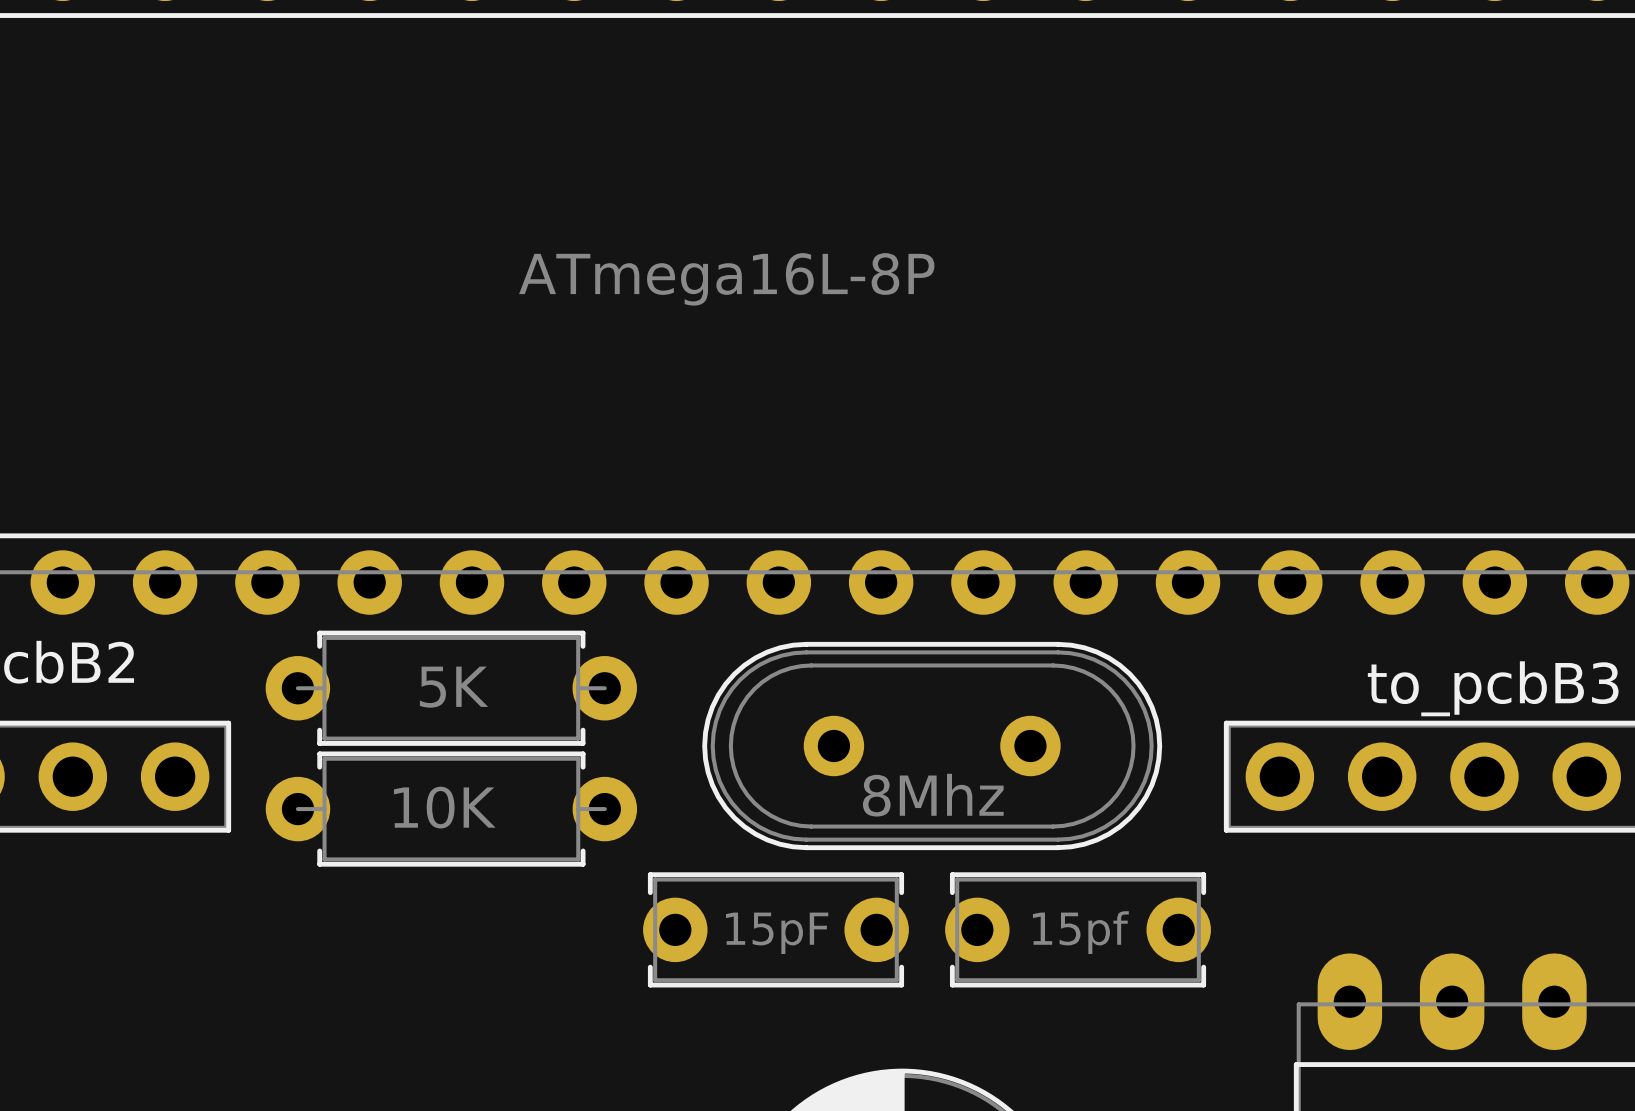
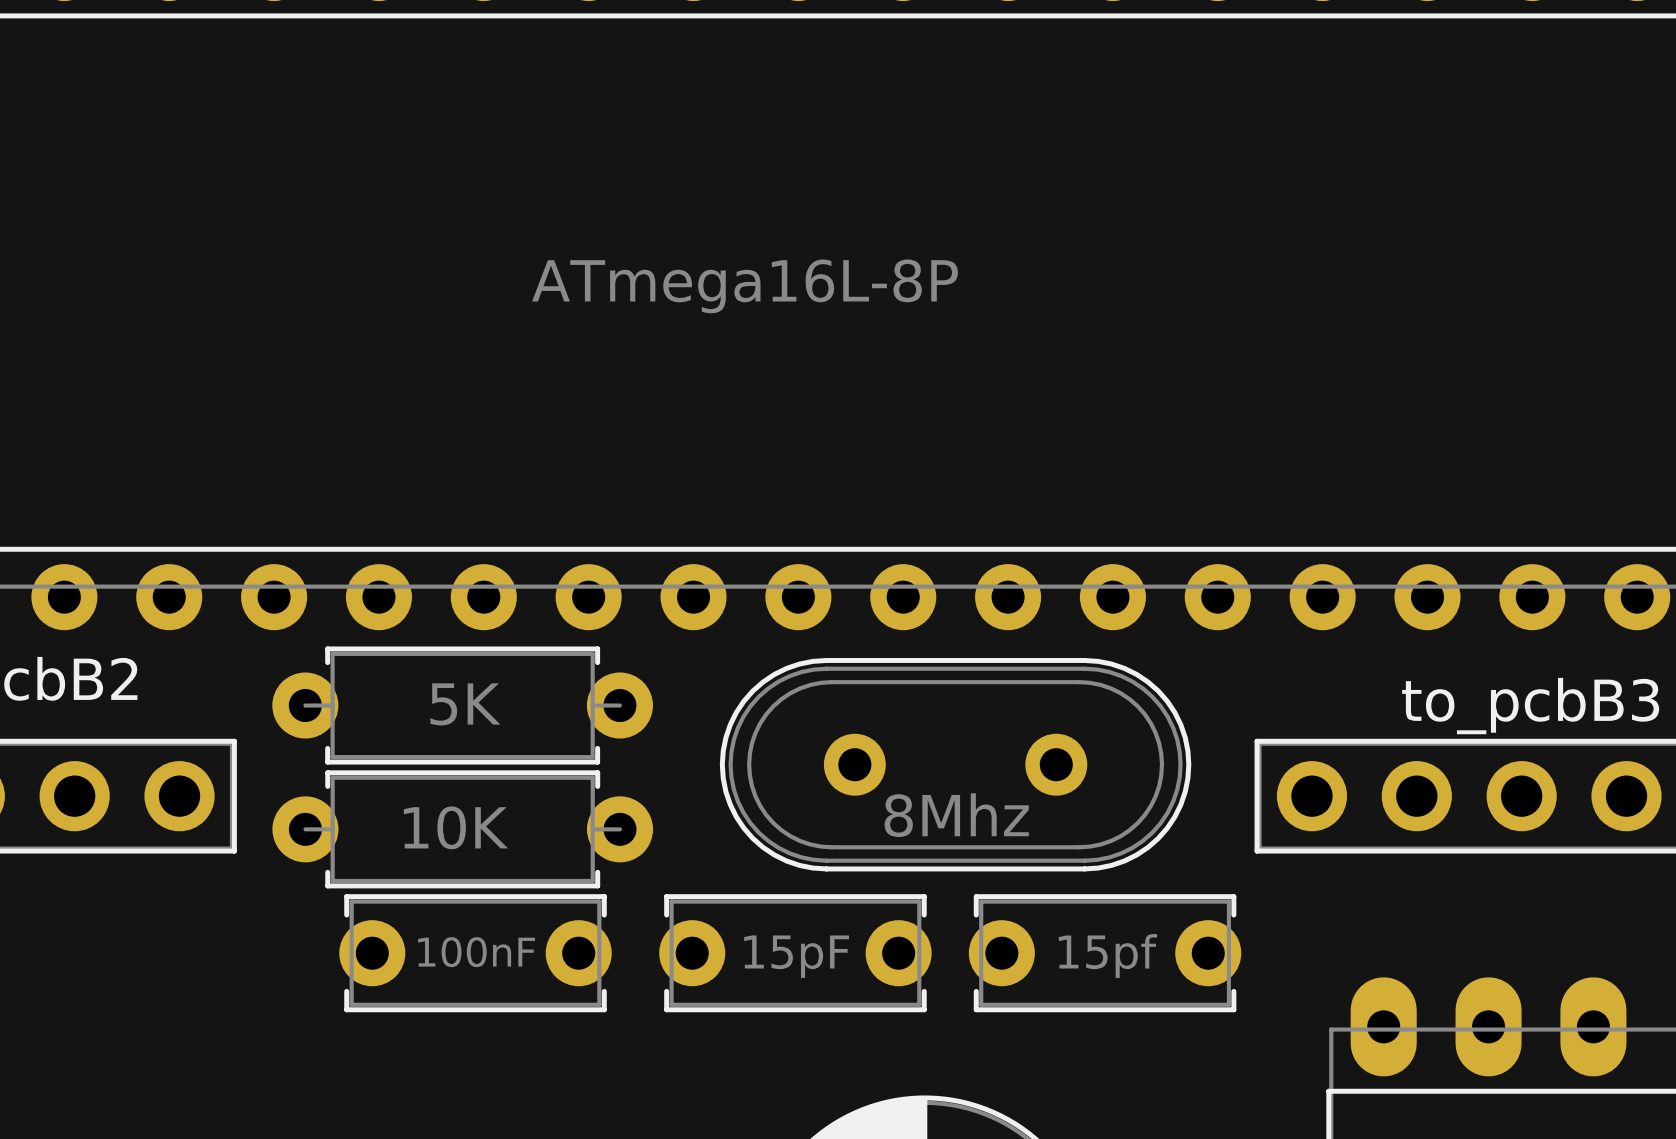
part: none -> 100nF (475, 953)

